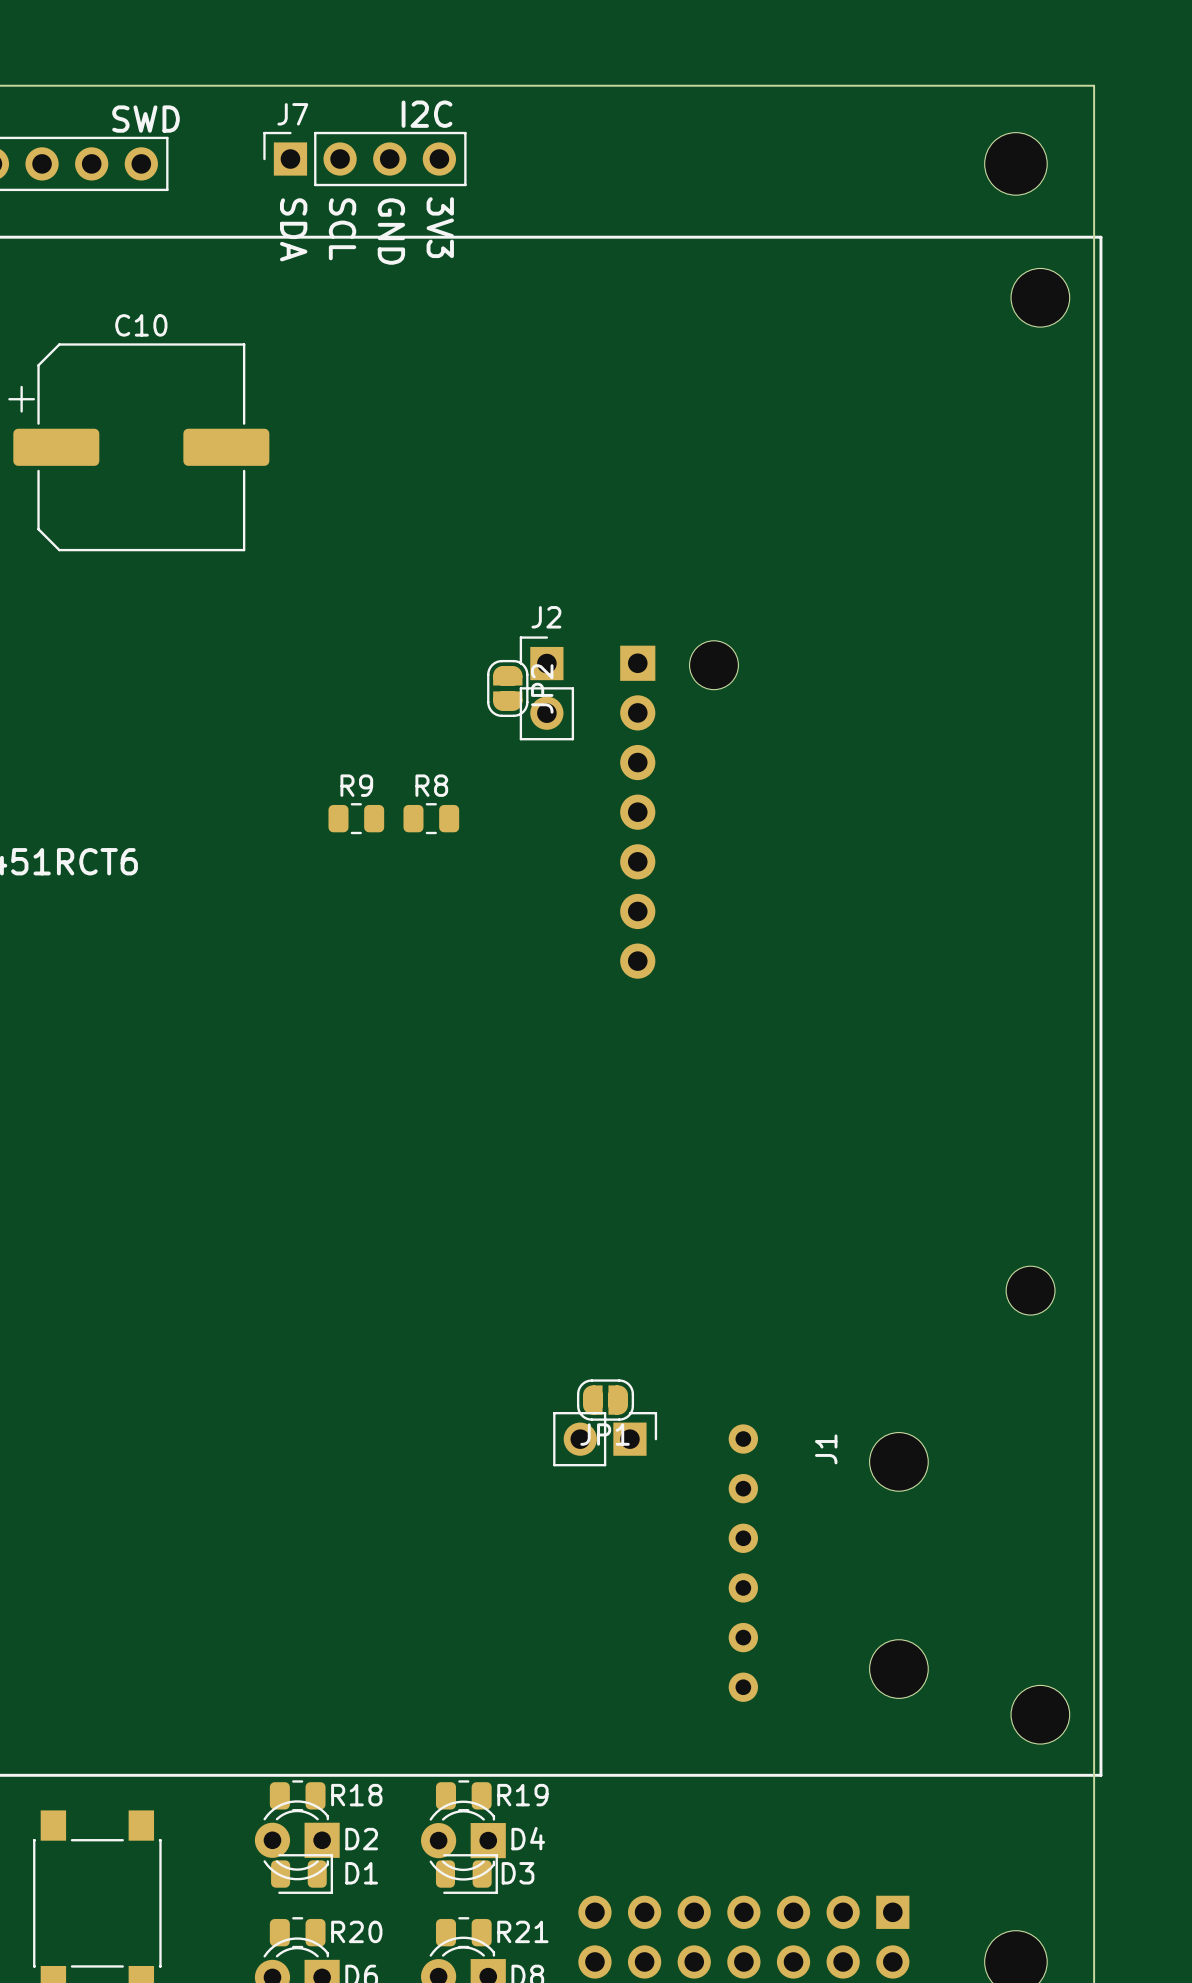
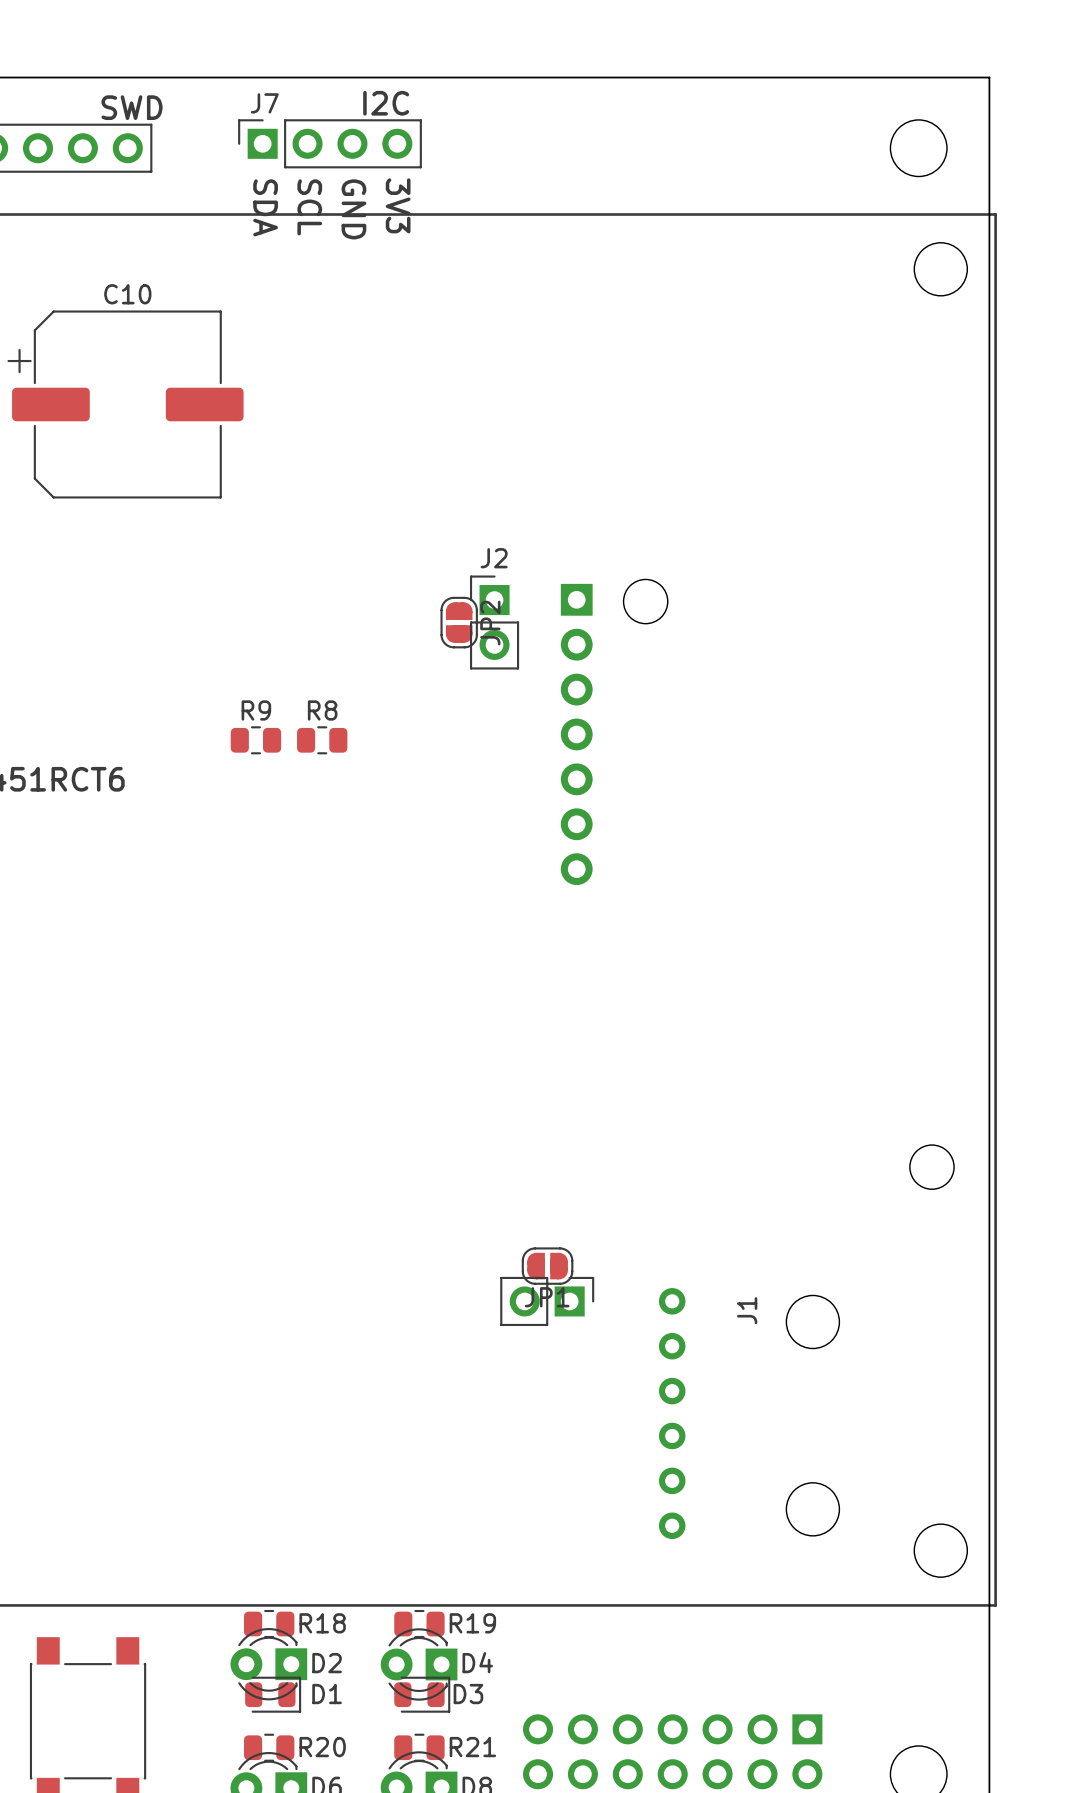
R9 name: R9 (356, 785) -> R8 (322, 710)
R9: none -> (255, 740)
R8: (431, 818) -> none

